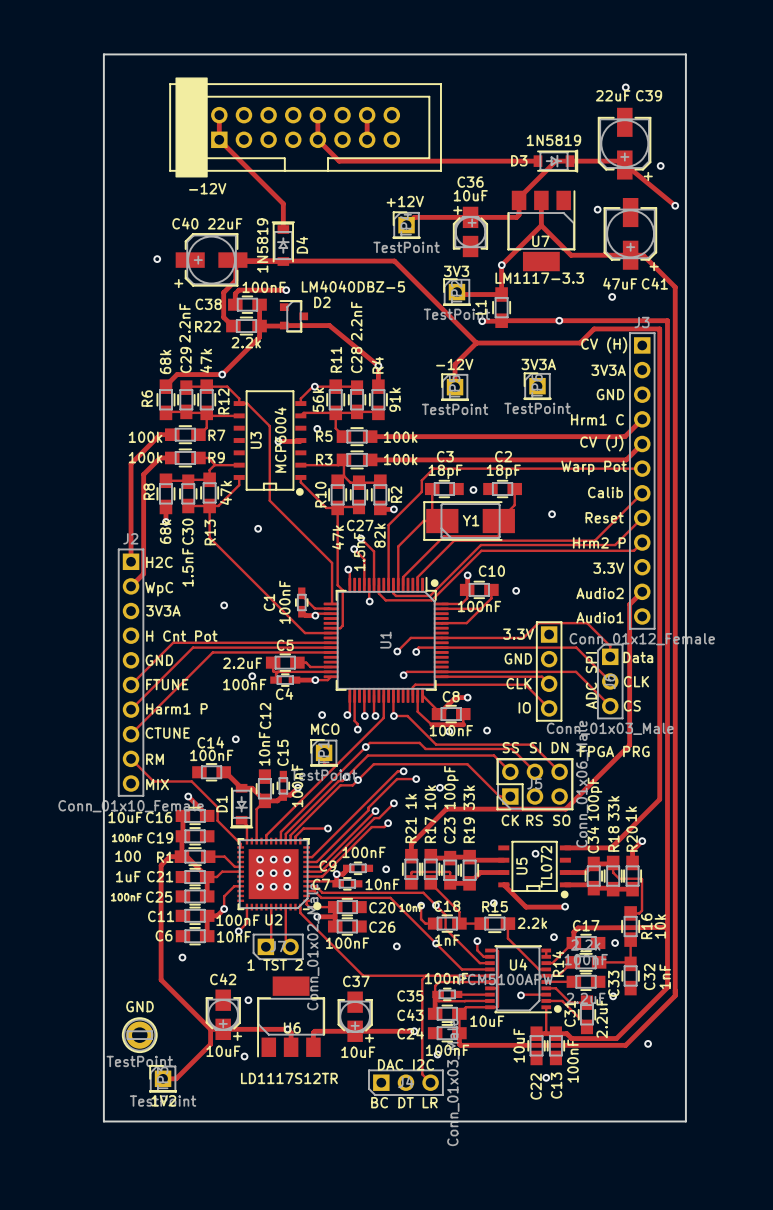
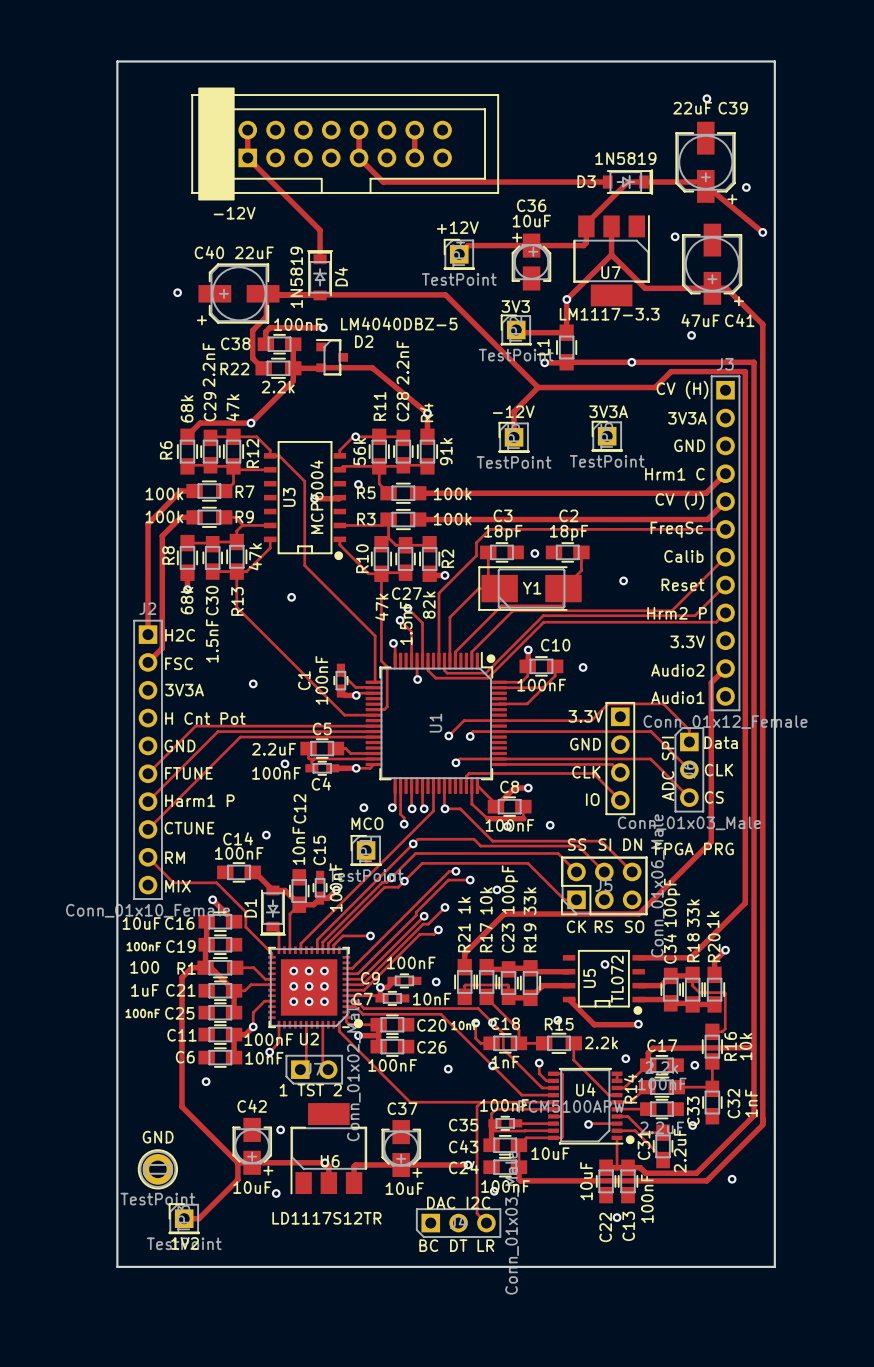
text: Warp Pot (594, 467) -> none
text: none -> FreqSc (676, 529)
text: WpC (159, 589) -> FSC (179, 663)

